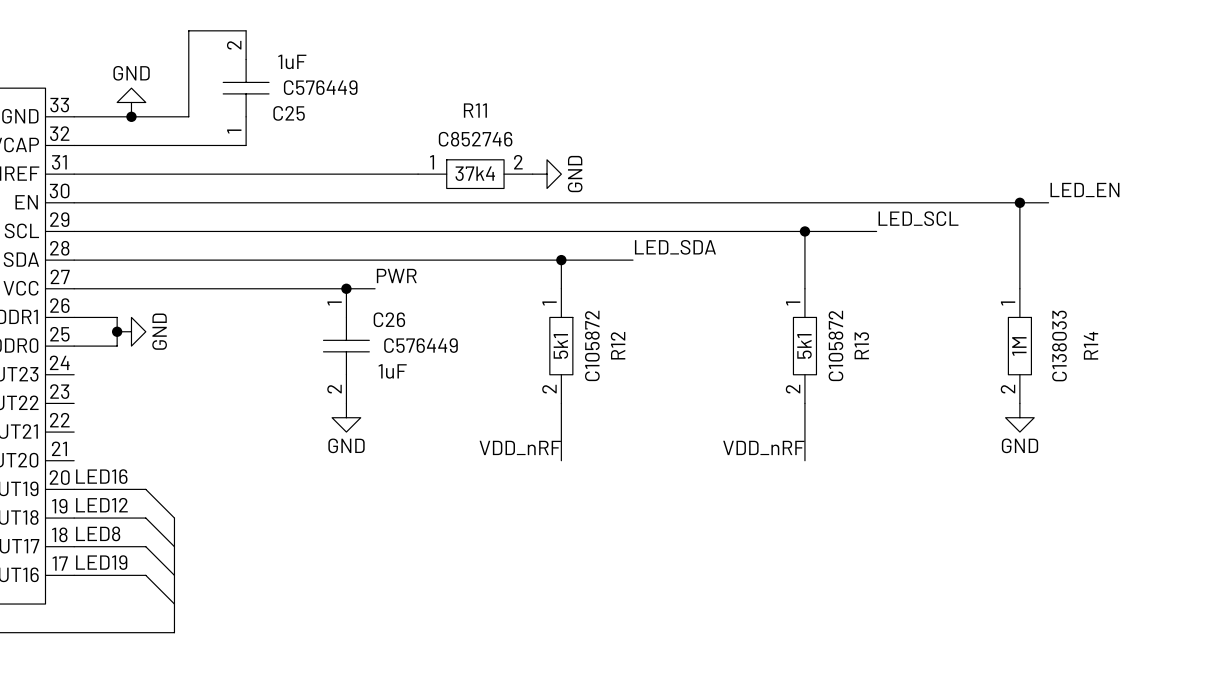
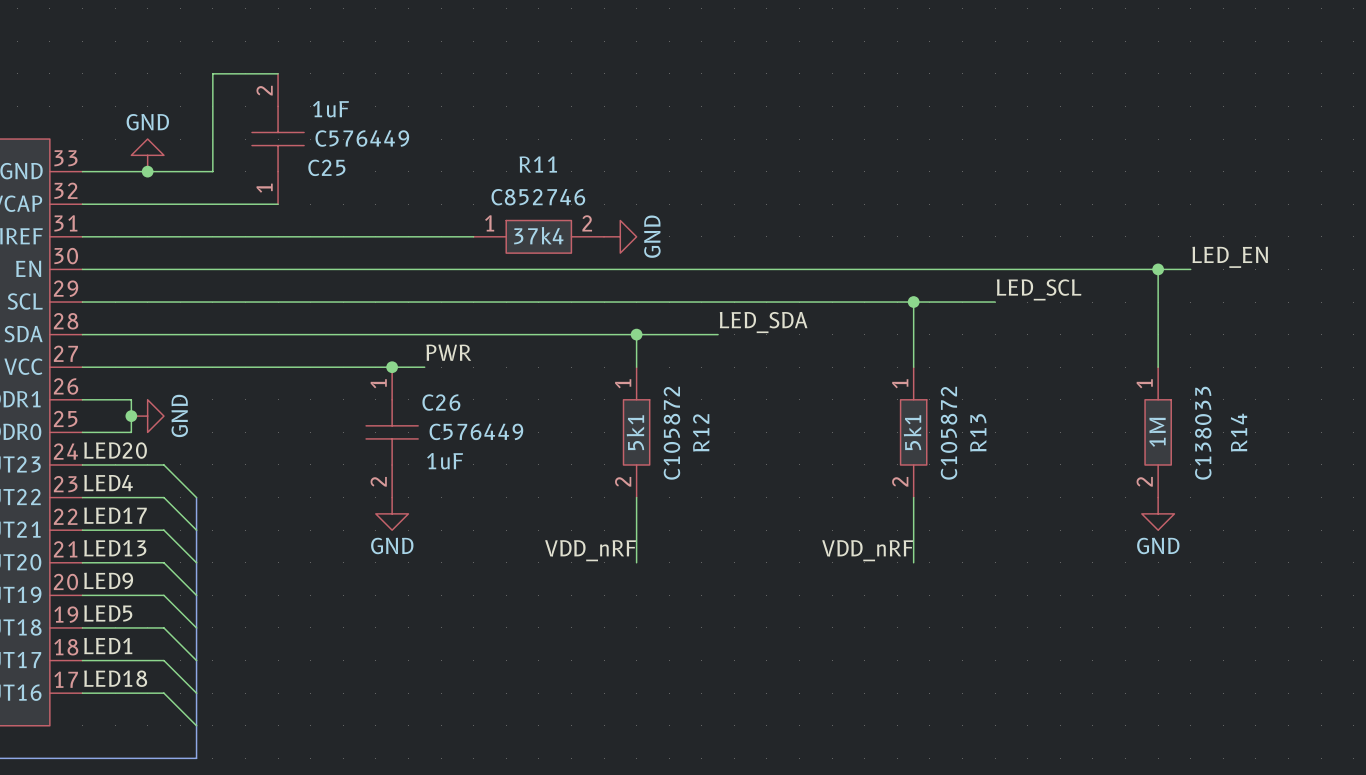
label: none -> LED20 (115, 450)
wire: none -> (82, 464) (163, 464) (196, 497)
label: none -> LED4 (108, 483)
wire: none -> (82, 497) (163, 497) (196, 530)
bus: none -> (196, 497) (196, 627)
label: none -> LED17 (115, 515)
wire: none -> (82, 530) (163, 530) (196, 562)
label: none -> LED13 (115, 548)
wire: none -> (82, 562) (163, 562) (196, 595)
label: LED16 (101, 476) -> LED9 (108, 580)
label: LED12 (101, 505) -> LED5 (108, 613)
label: LED8 (98, 533) -> LED1 (108, 646)
label: LED19 (101, 562) -> LED18 (115, 678)

